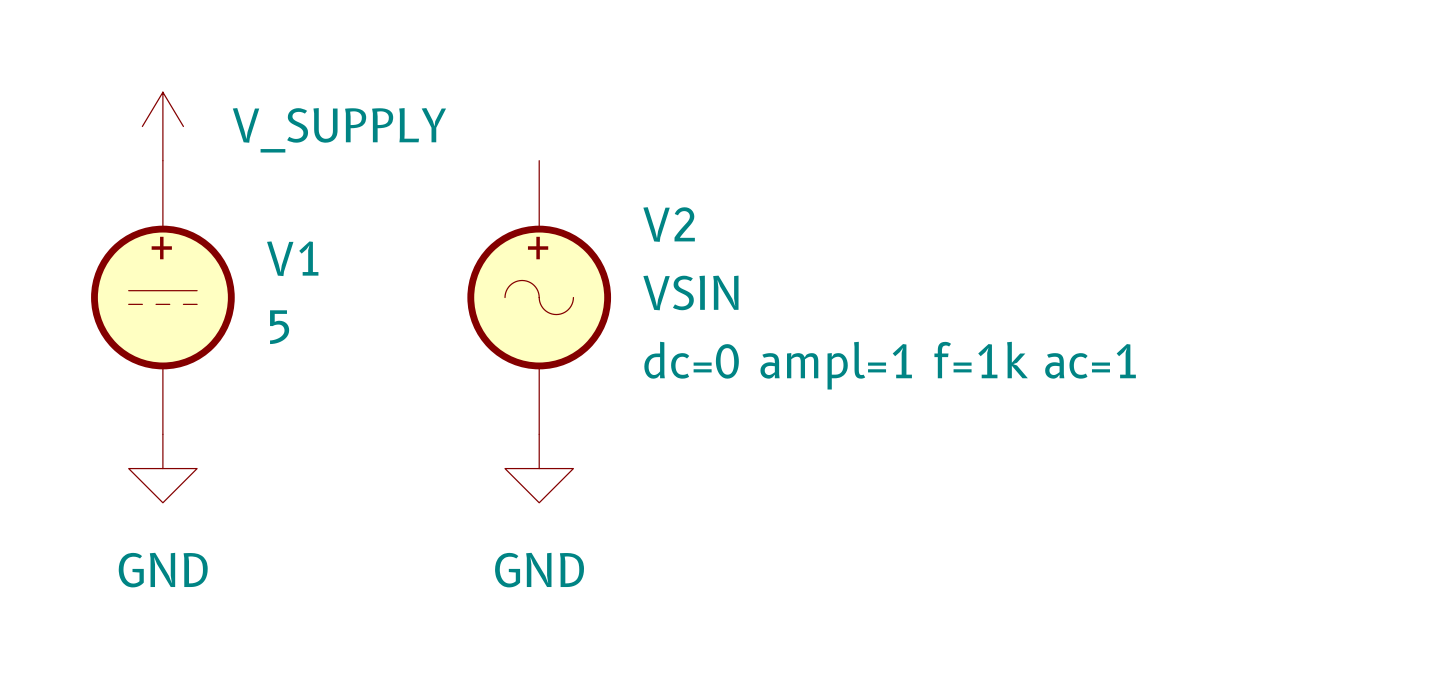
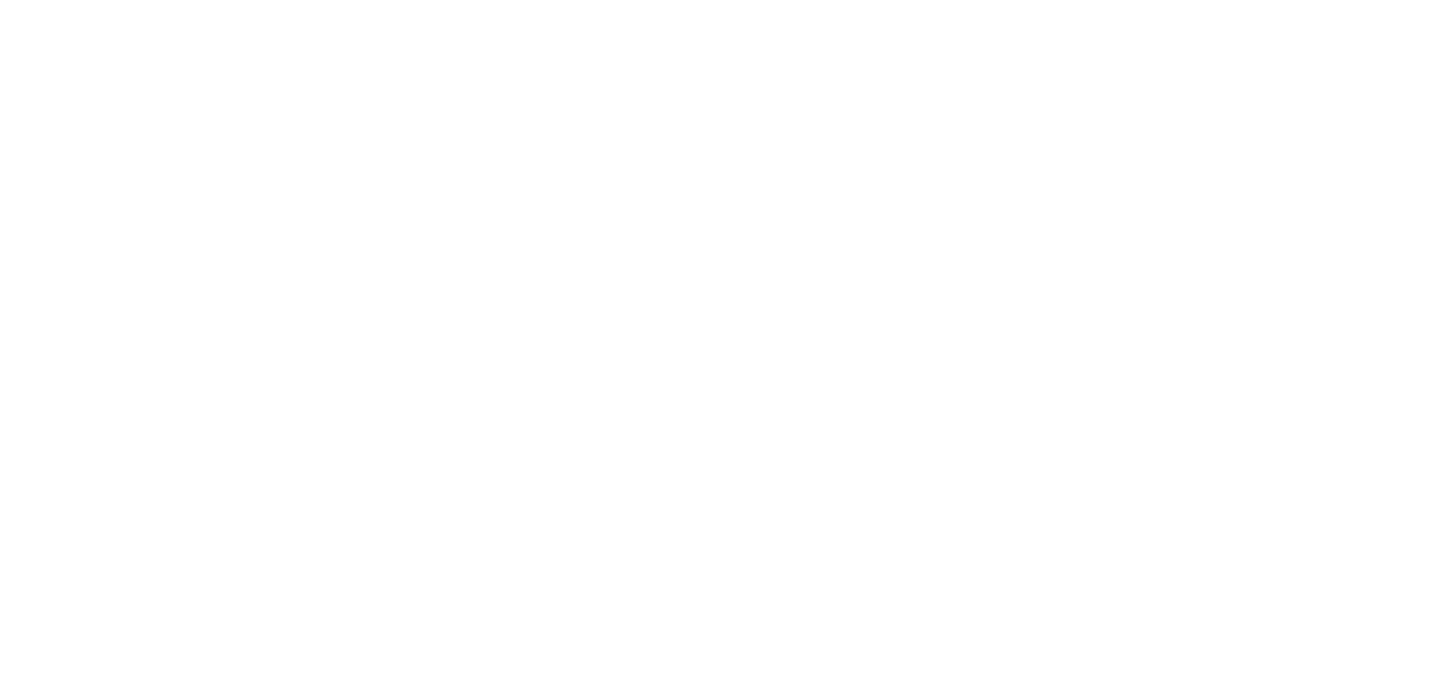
power symbol: V_SUPPLY (162, 126) -> none
V1: 5 (162, 297) -> none
V2: VSIN (539, 297) -> none
power symbol: GND (162, 468) -> none
power symbol: GND (539, 468) -> none

